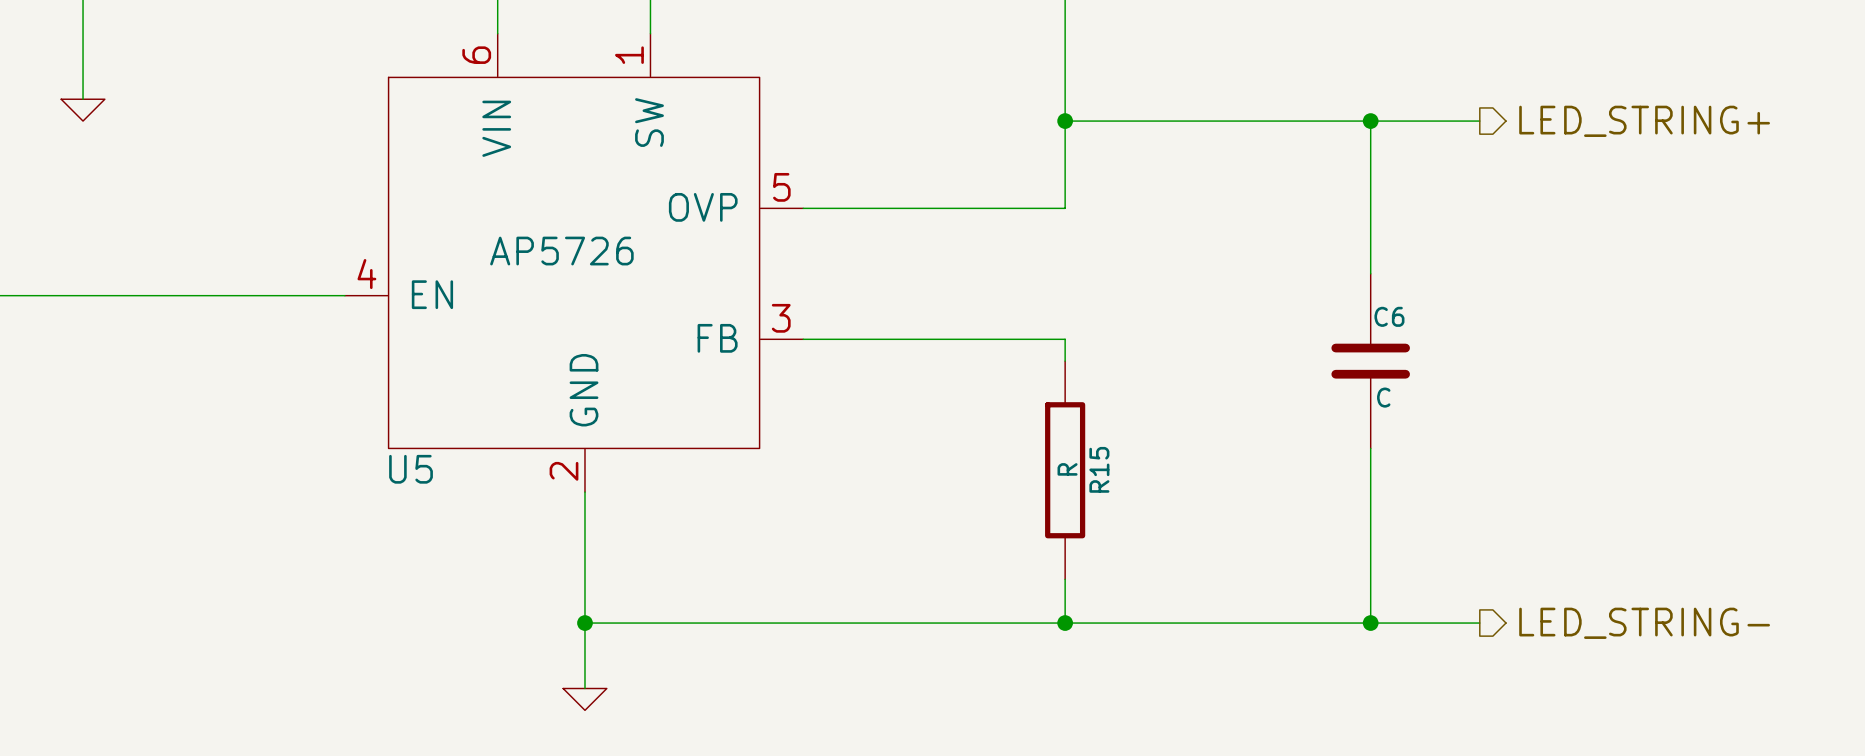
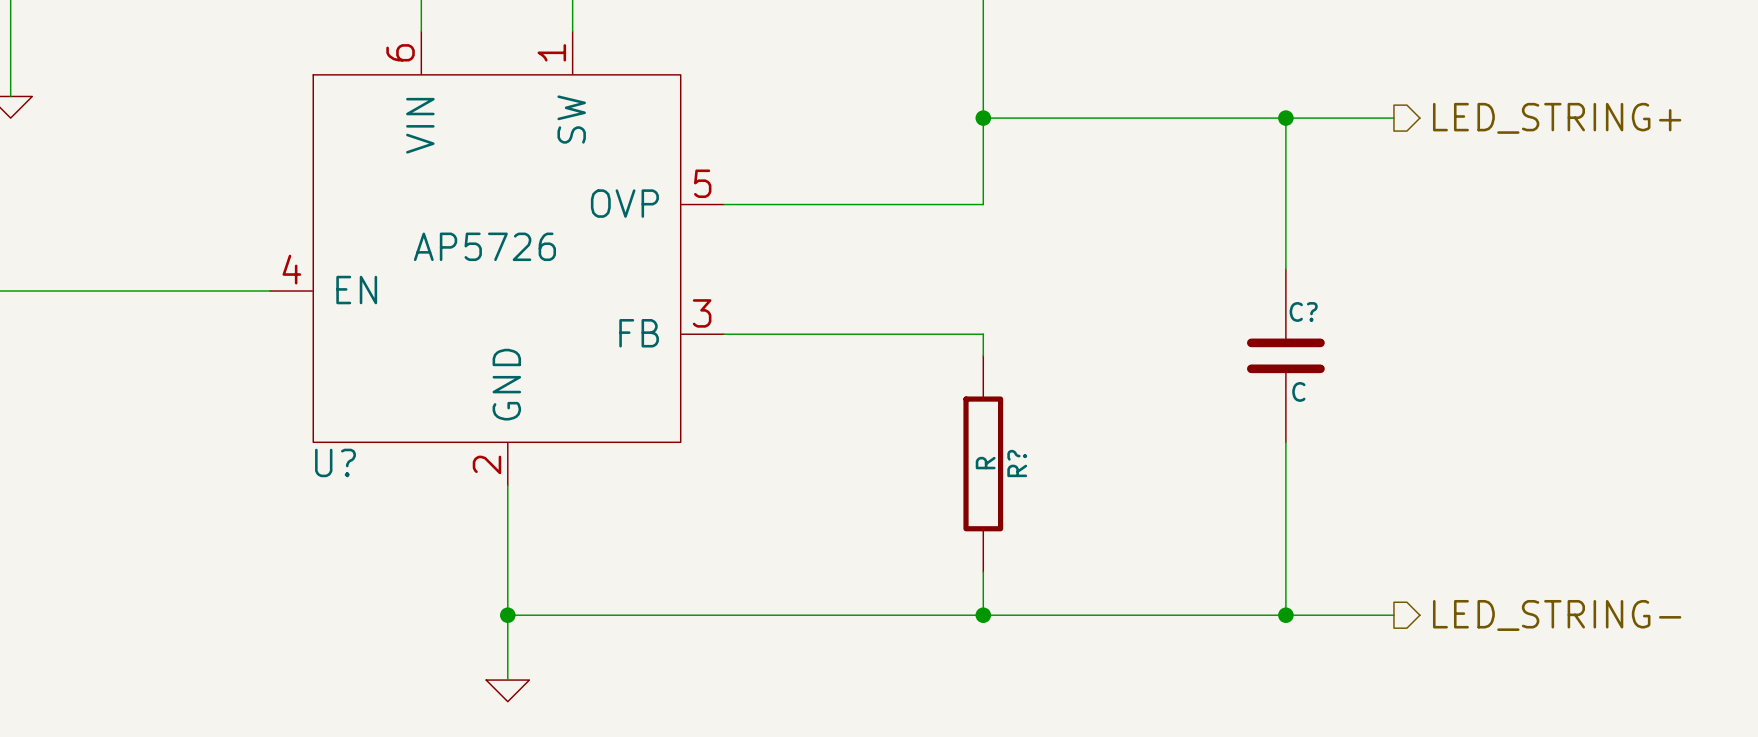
C6 name: C6 (1389, 316) -> C? (1303, 311)
U5 name: U5 (411, 469) -> U? (335, 462)
R15 name: R15 (1099, 469) -> R? (1017, 463)

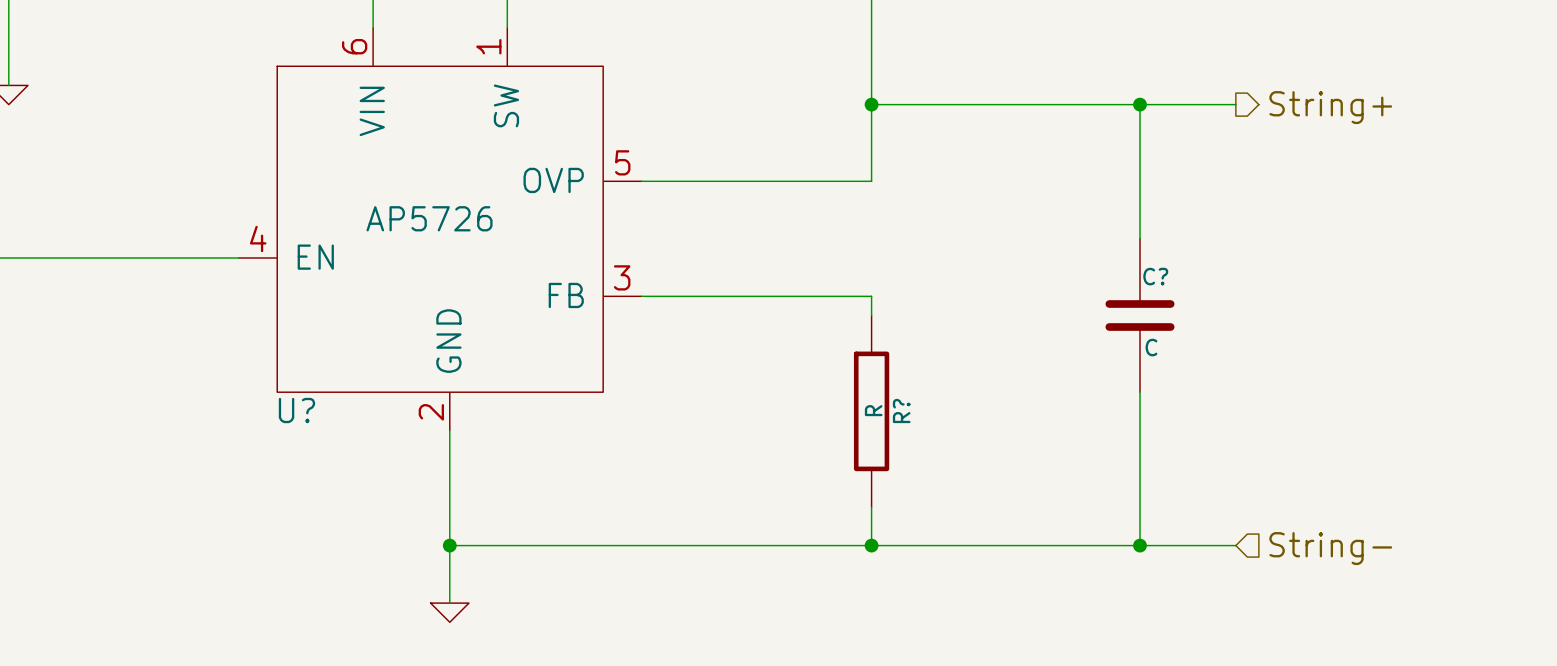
hierarchical label: LED_STRING+ (1557, 118) -> String+ (1330, 107)
hierarchical label shape: output (1557, 615) -> input (1330, 548)
hierarchical label: LED_STRING- (1557, 615) -> String- (1330, 548)

